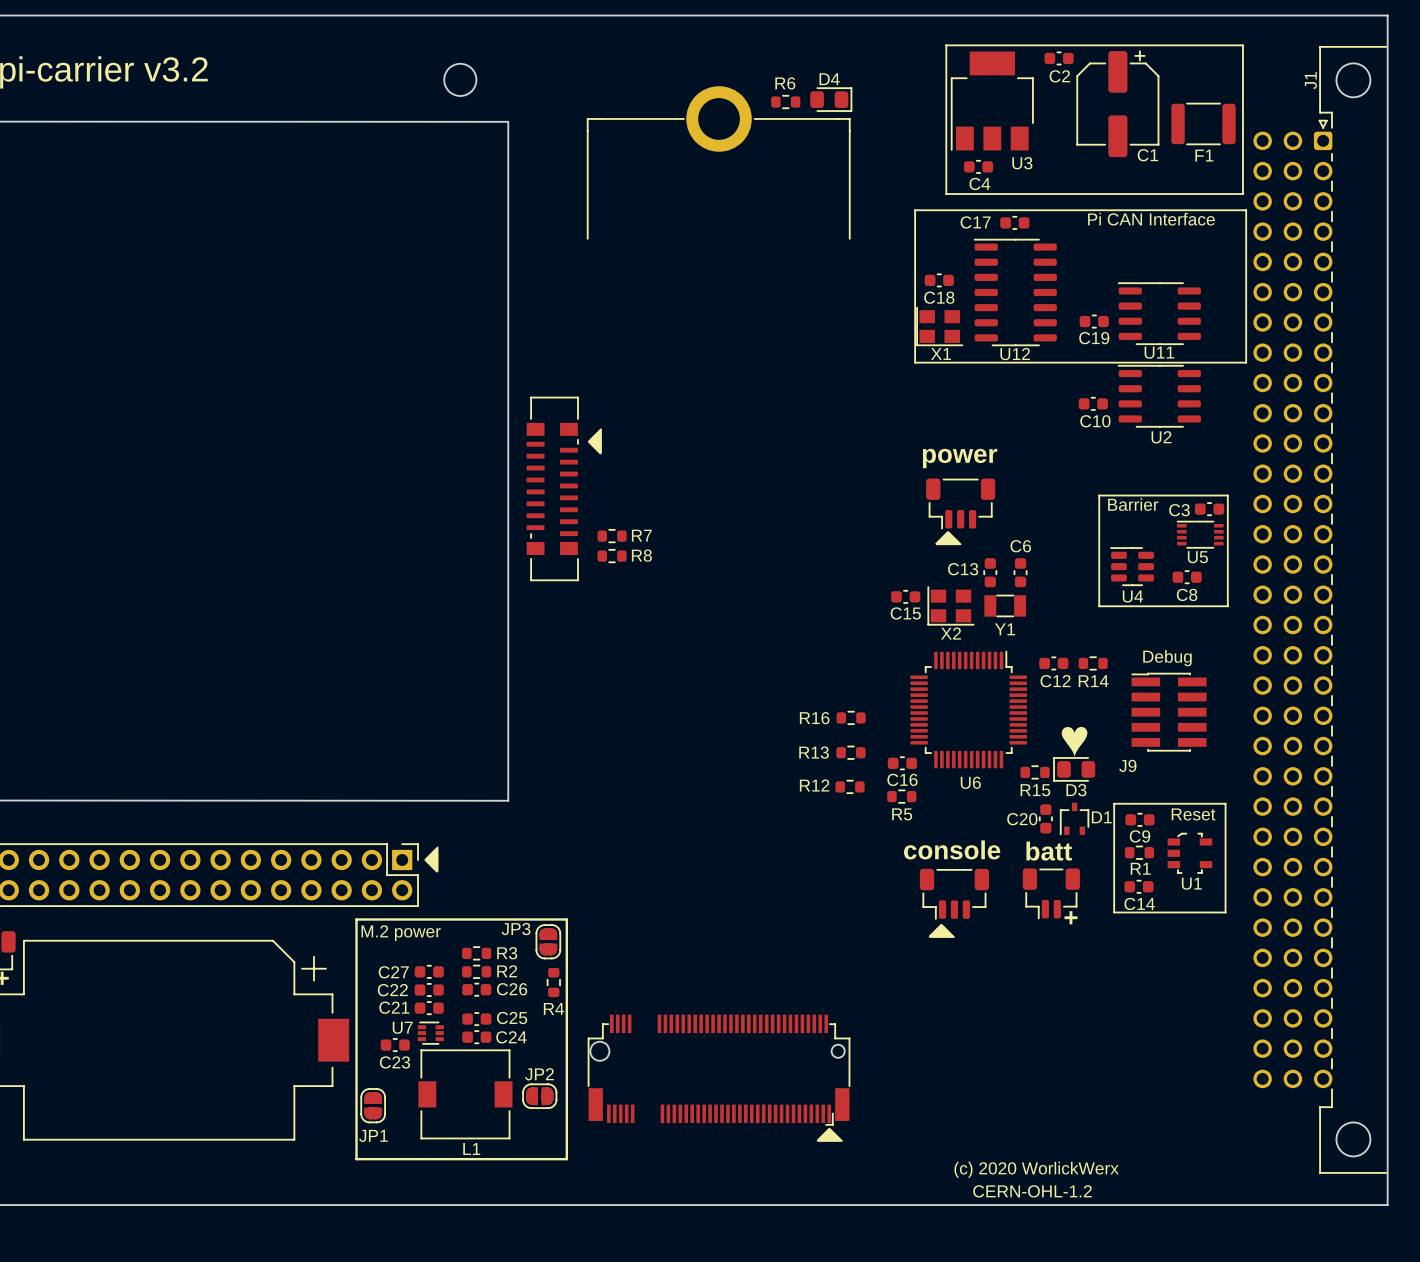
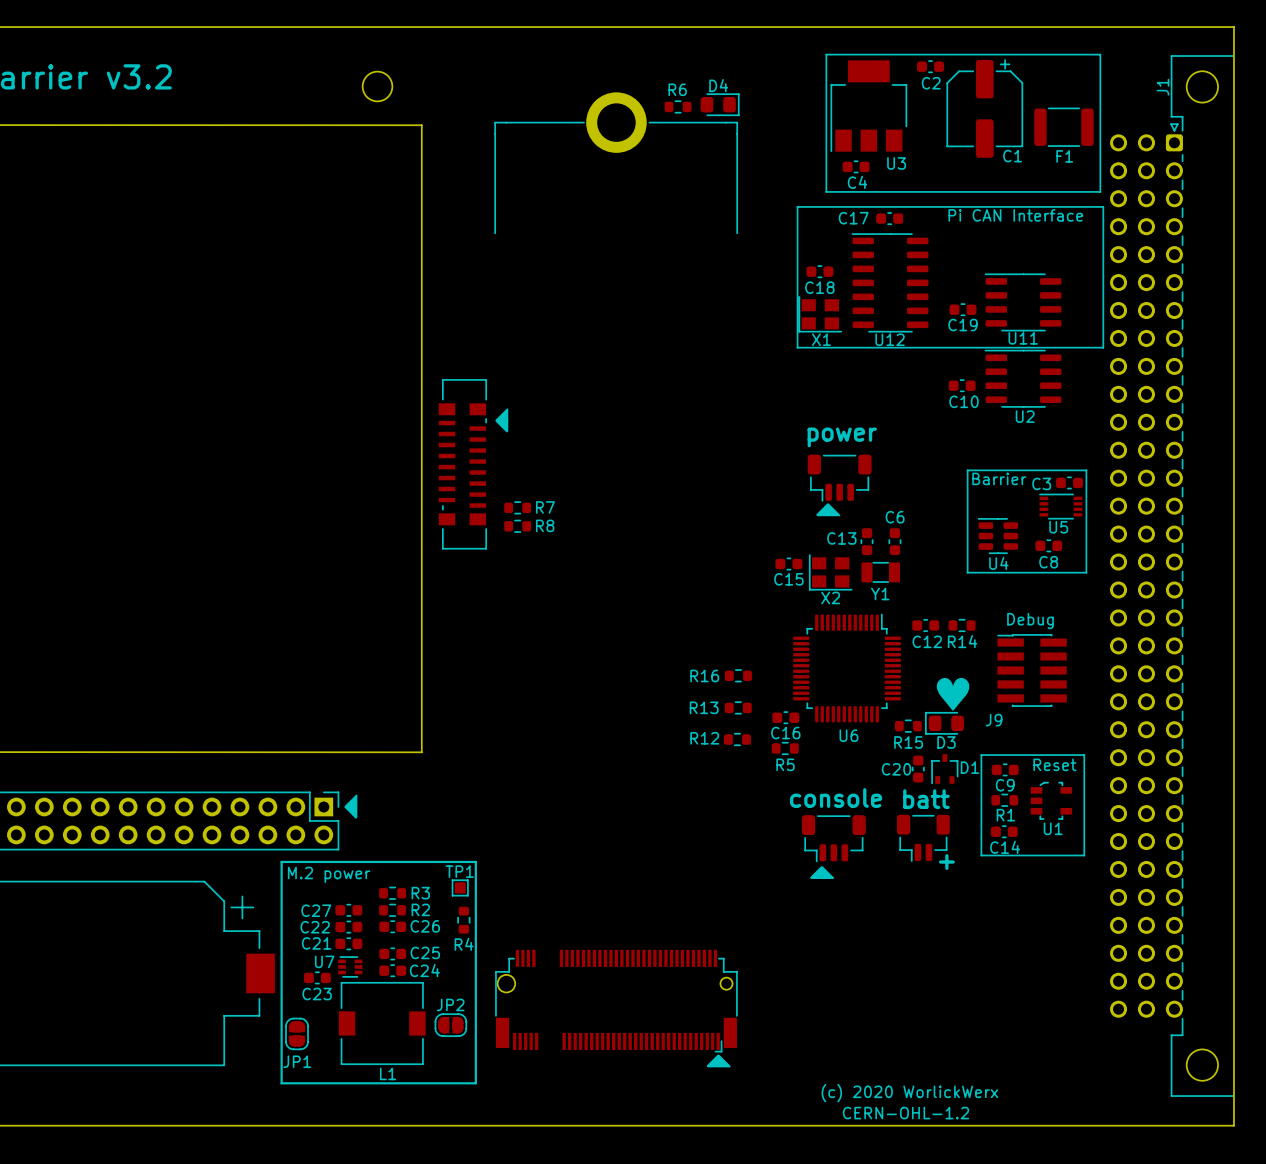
JP3: (548, 941) -> none
TP1: none -> (460, 887)

